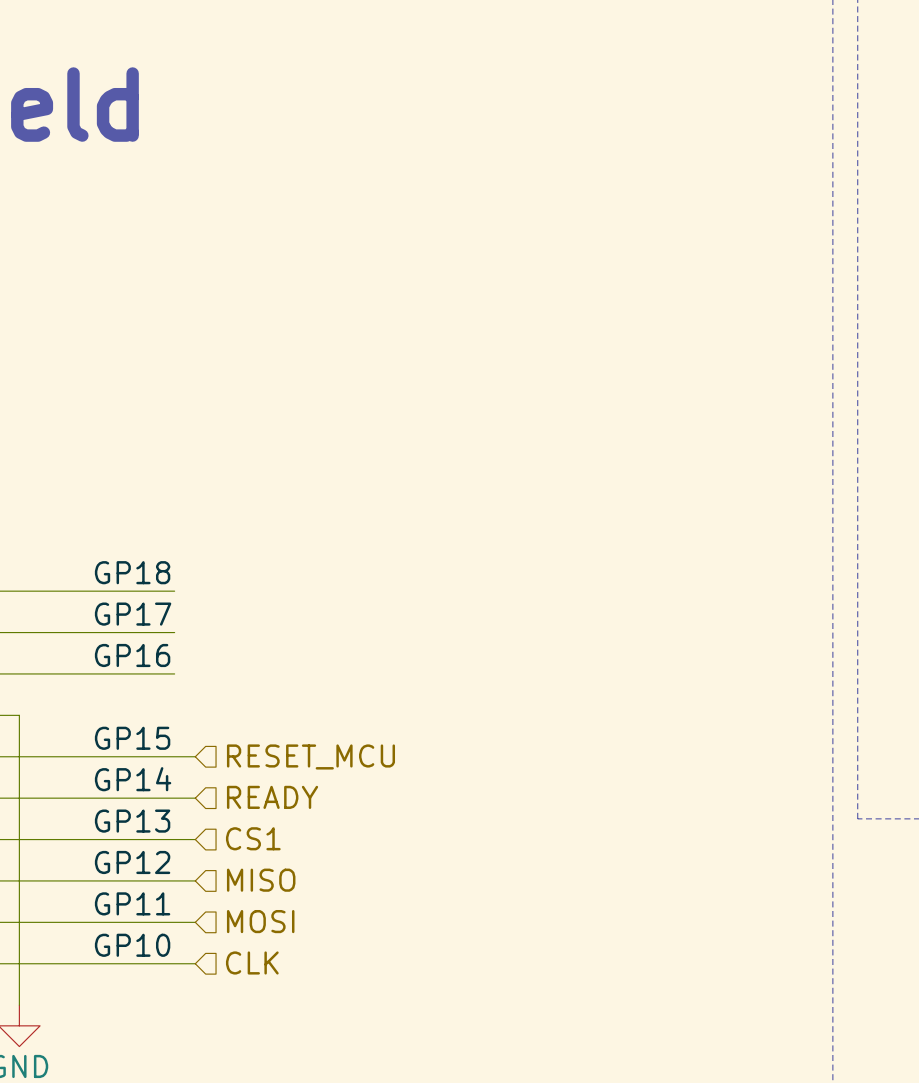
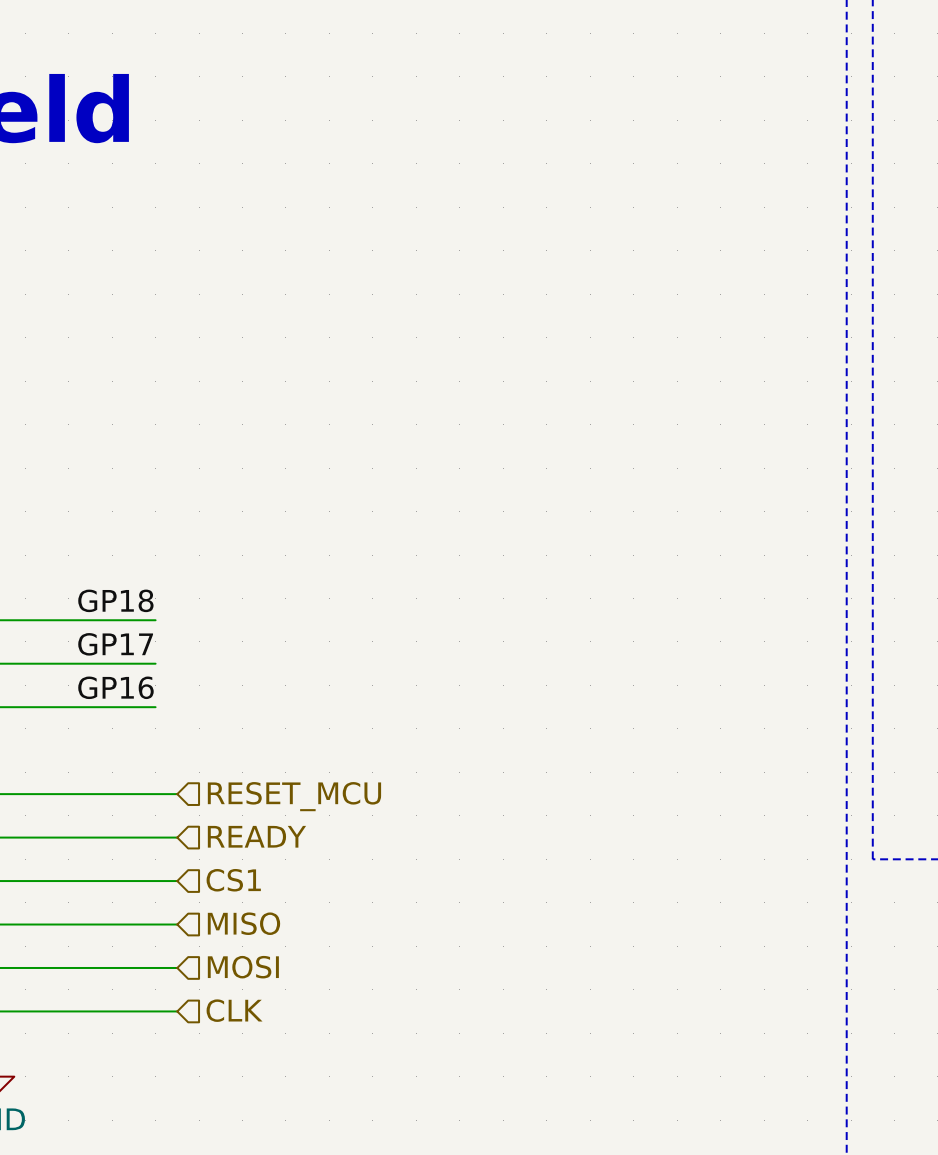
label: GP15 (132, 738) -> none
label: GP14 (133, 779) -> none
label: GP13 (132, 821) -> none
label: GP12 (132, 862) -> none
label: GP11 (132, 903) -> none
label: GP10 (132, 945) -> none

